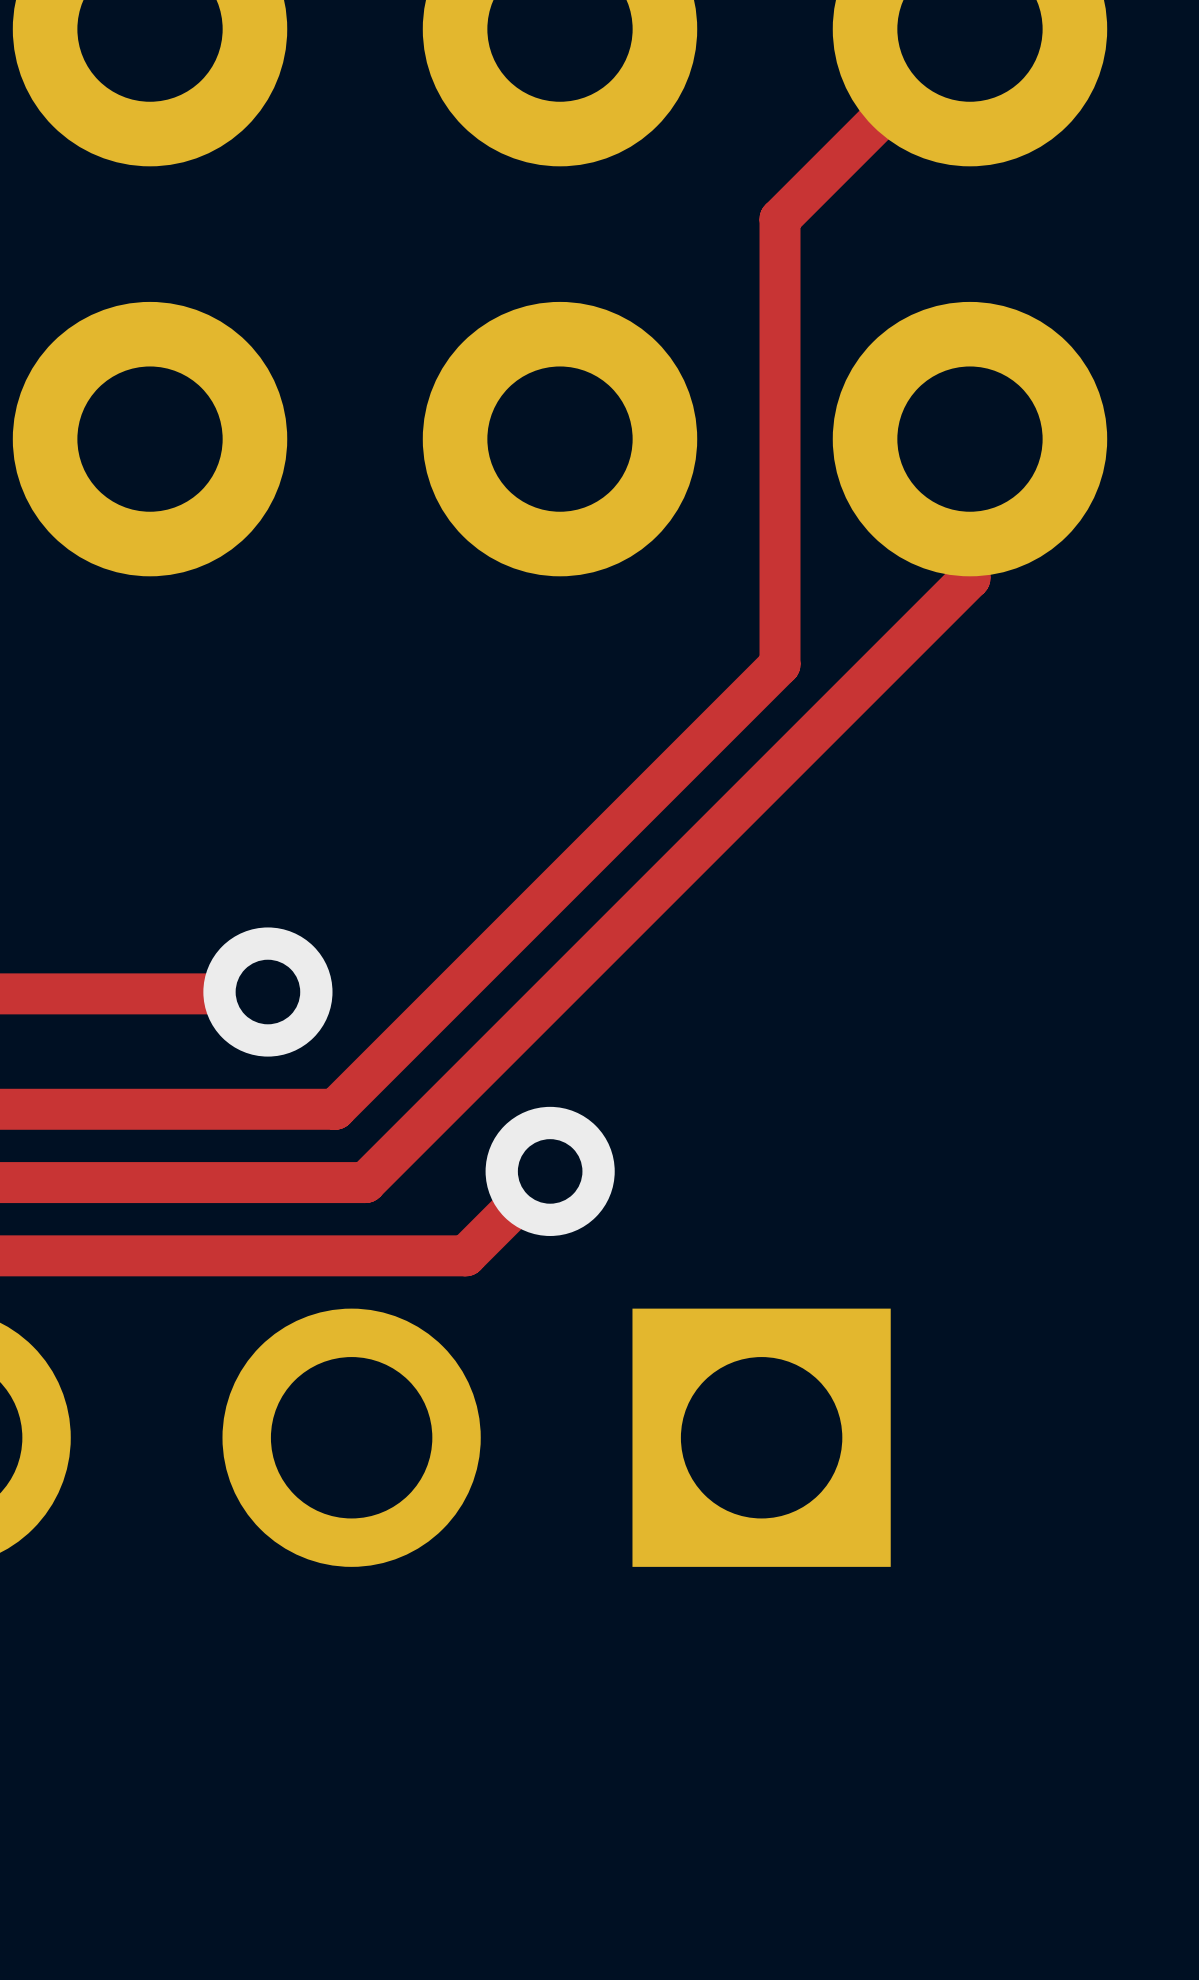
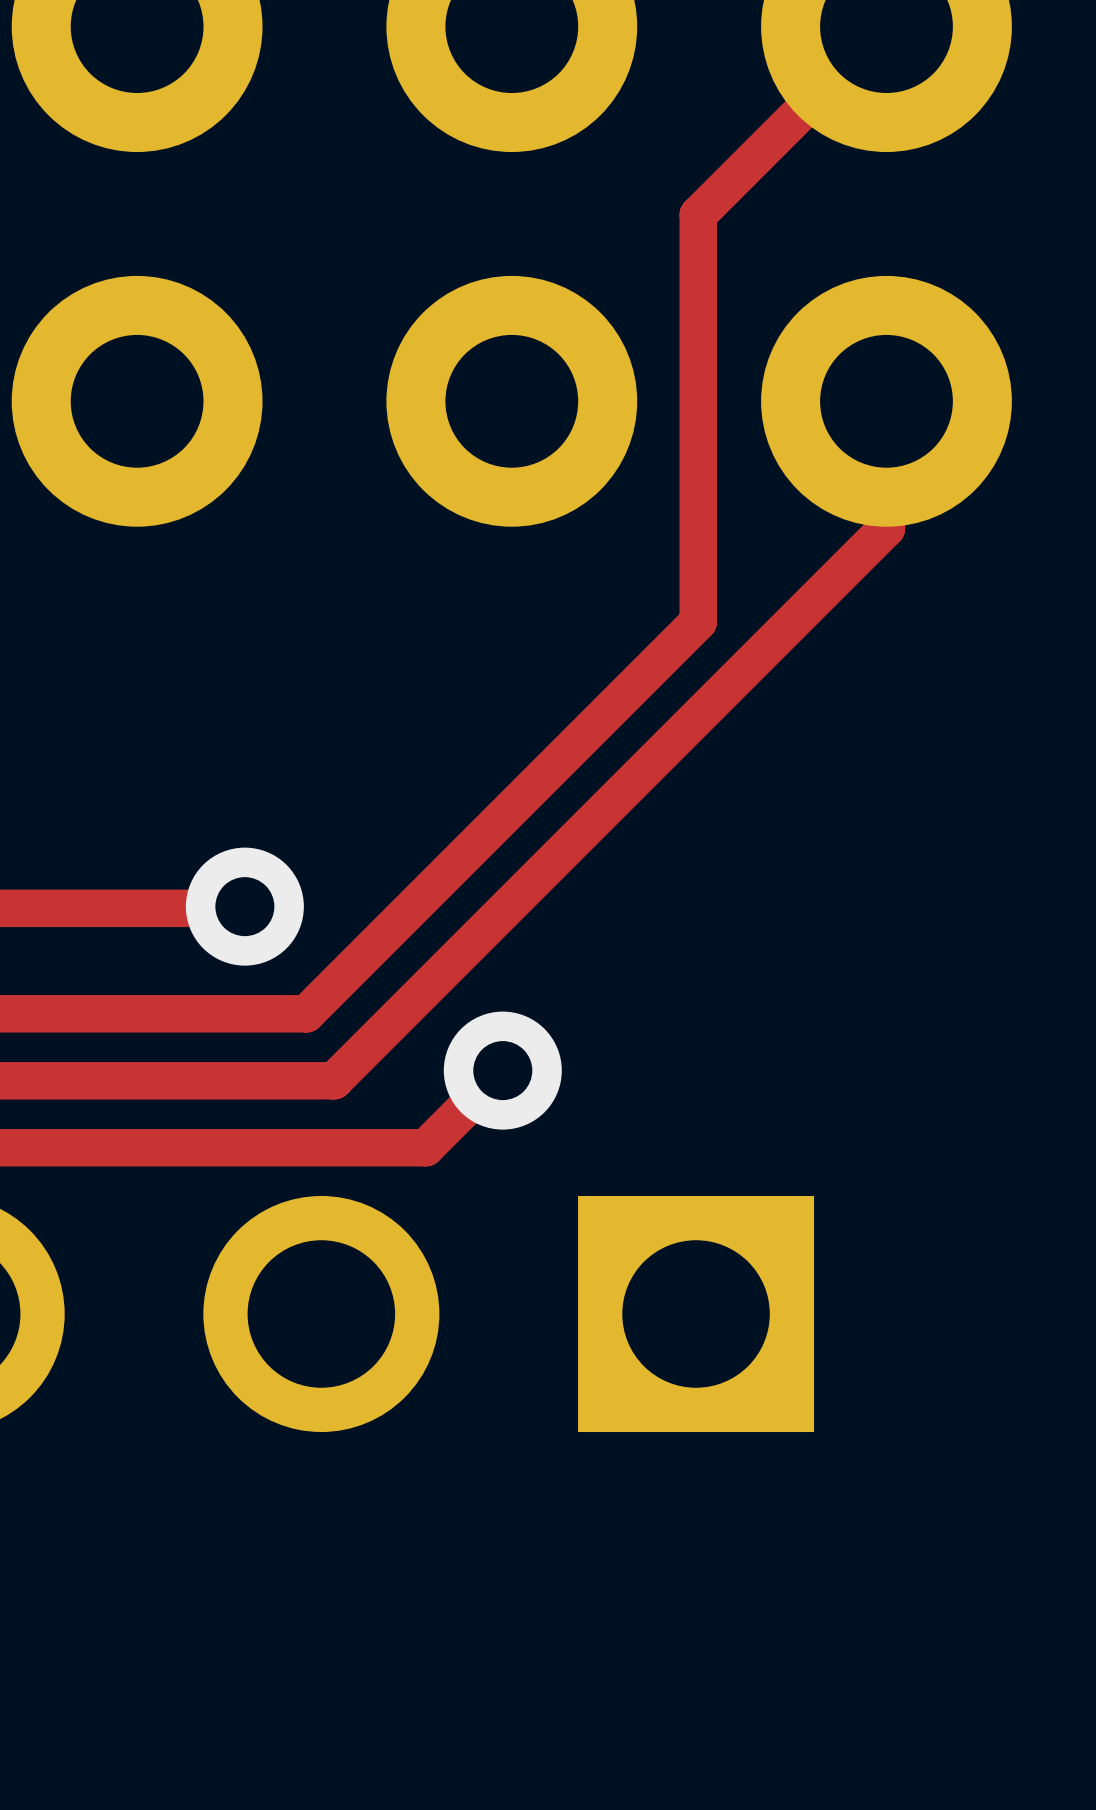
track: (780, 219) (780, 664) (764, 680) -> (712, 200) (698, 214) (698, 621)

